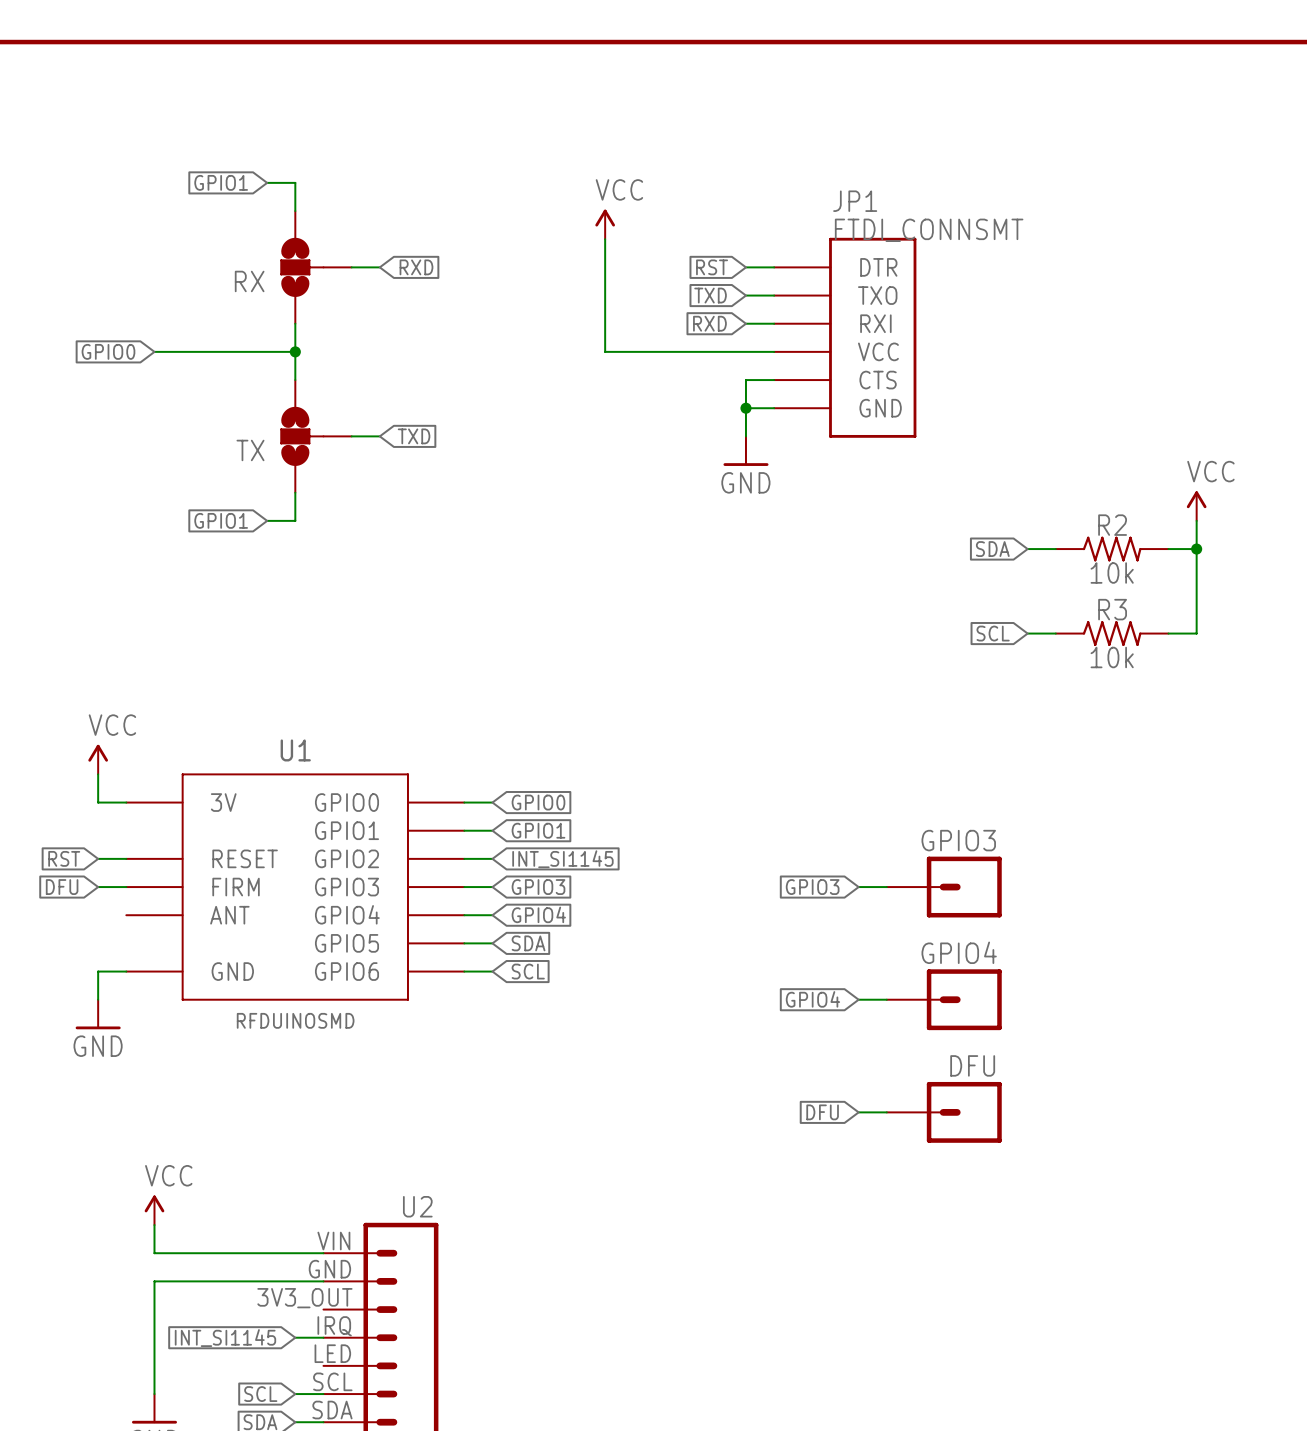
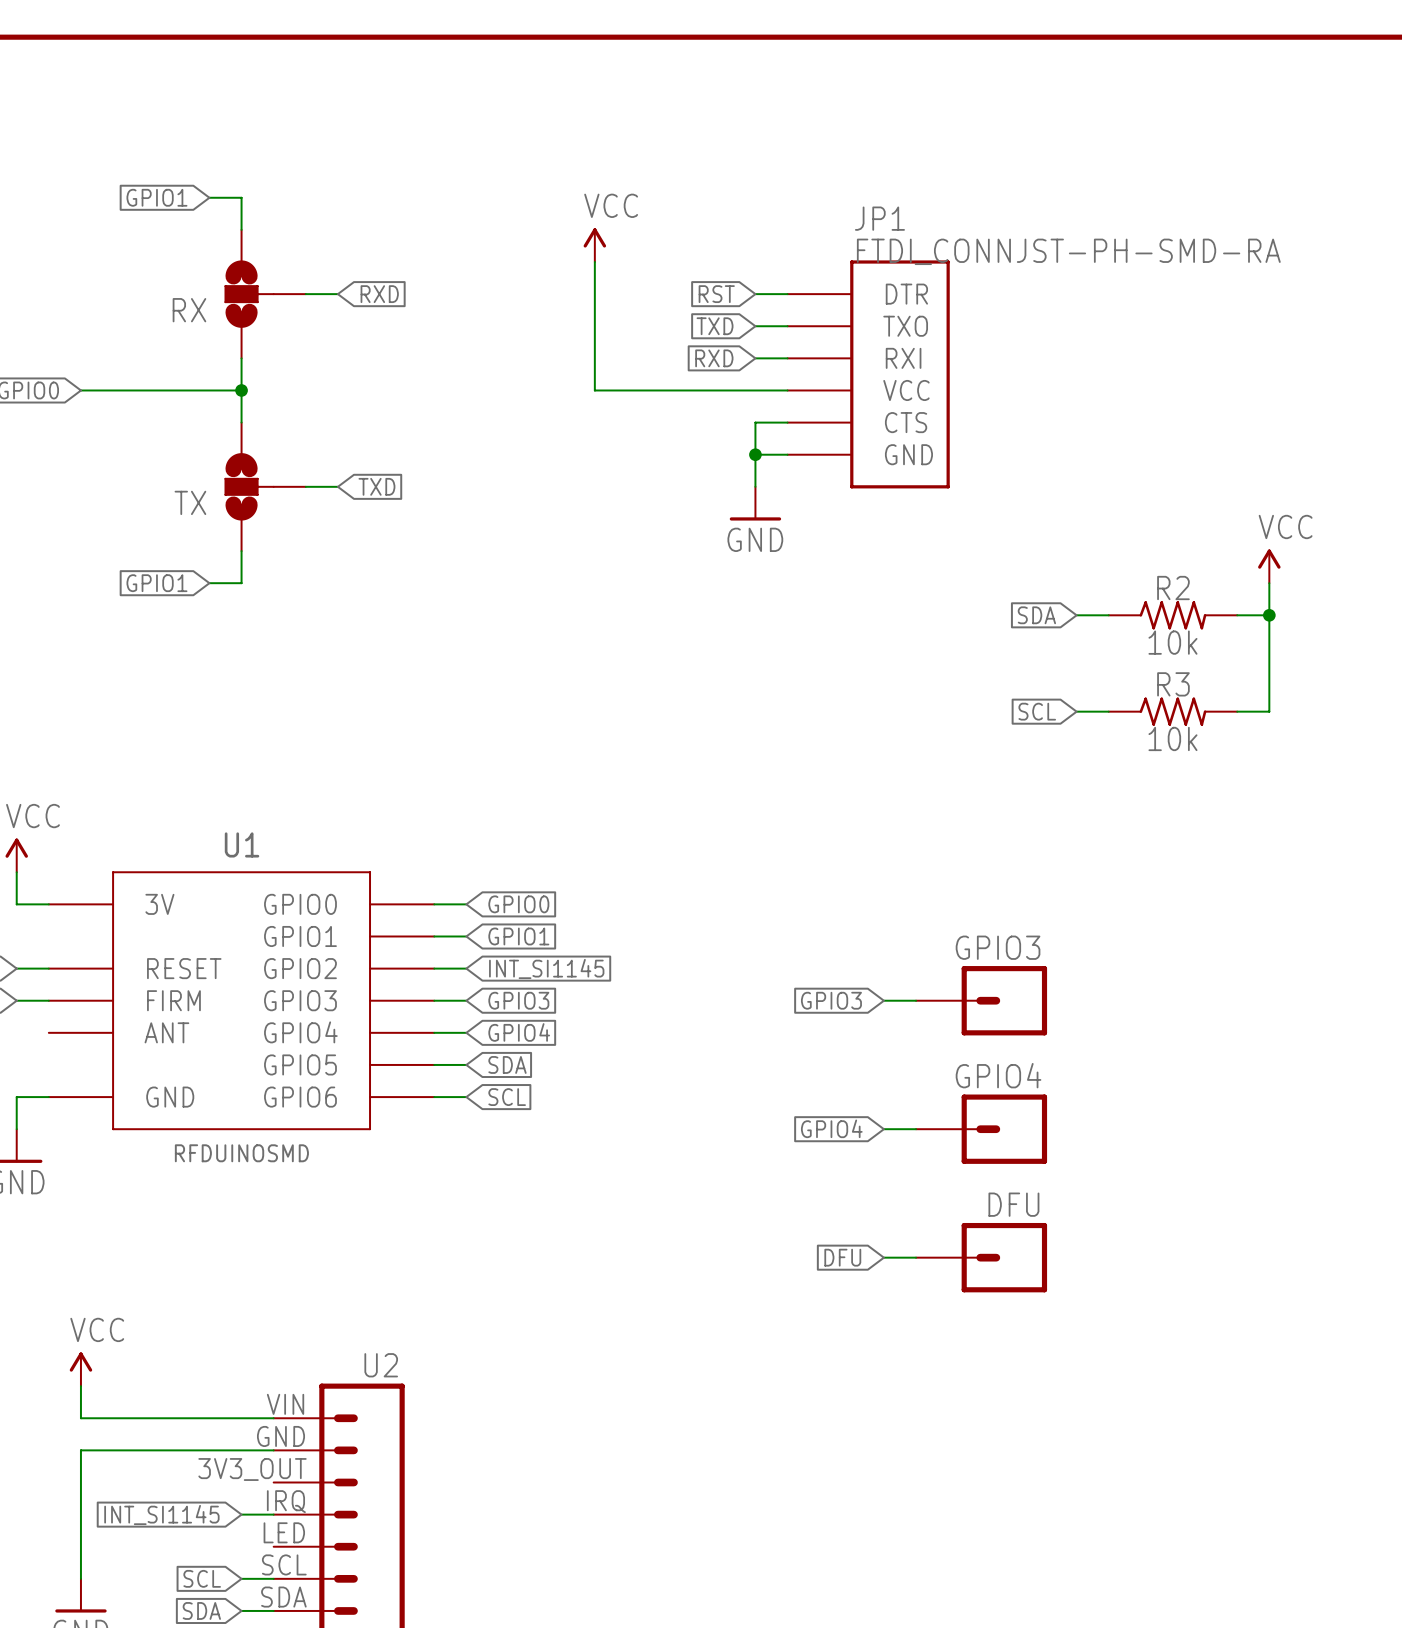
JP1 value: FTDI_CONNSMT (929, 230) -> FTDI_CONNJST-PH-SMD-RA (1068, 251)

